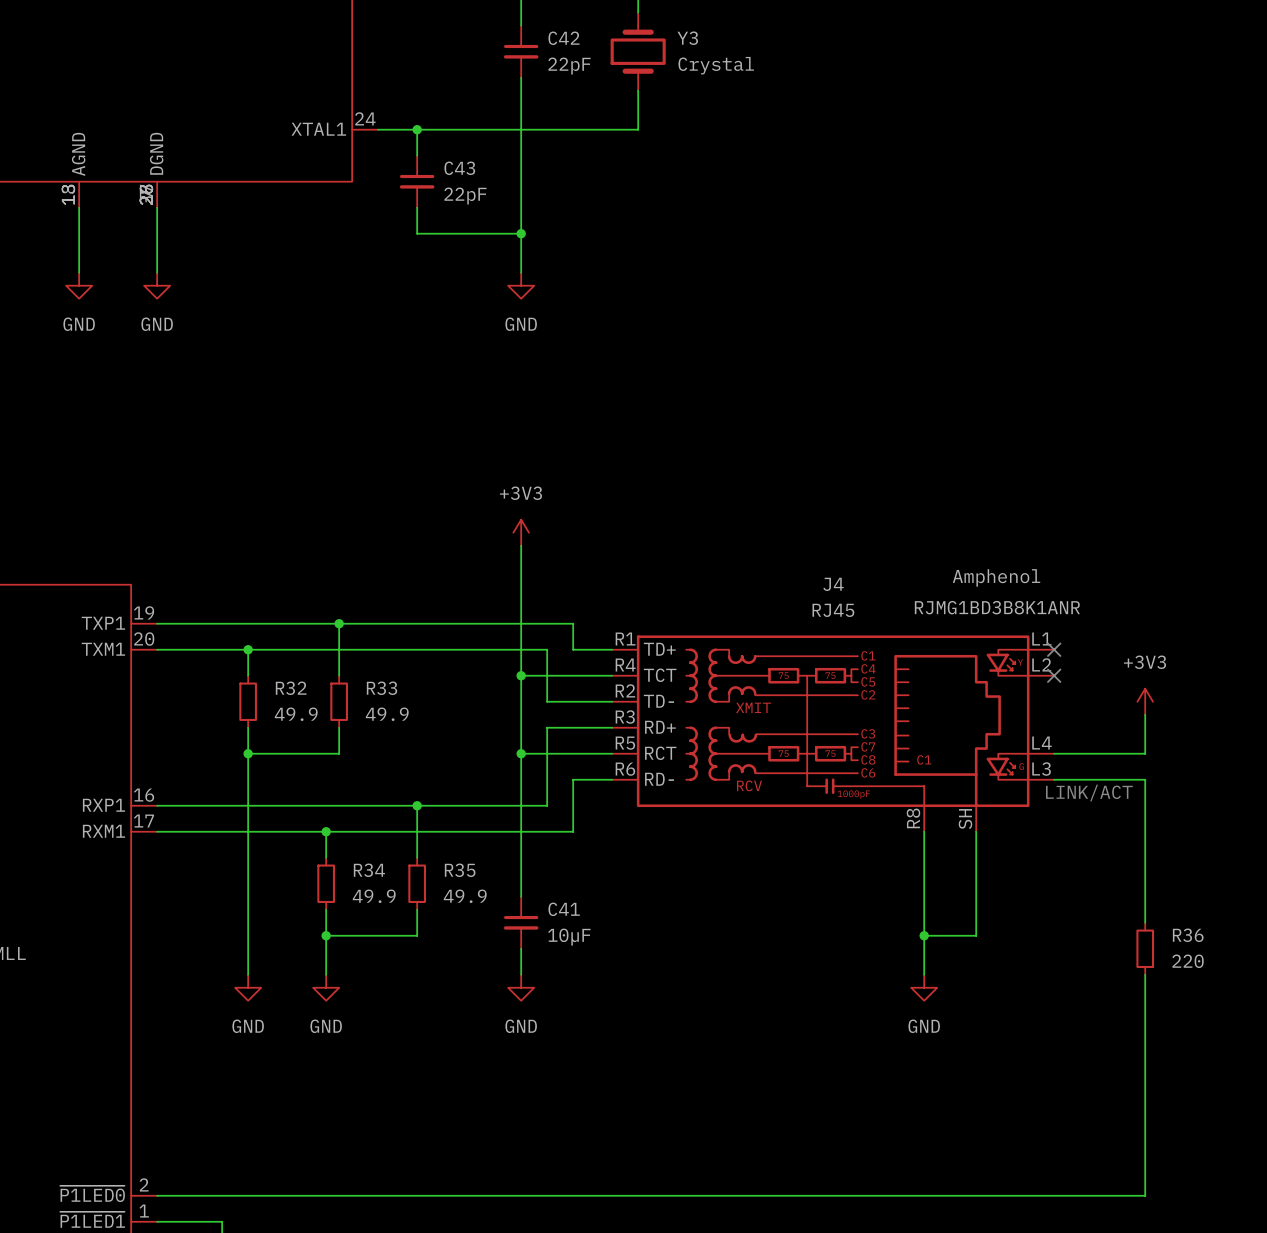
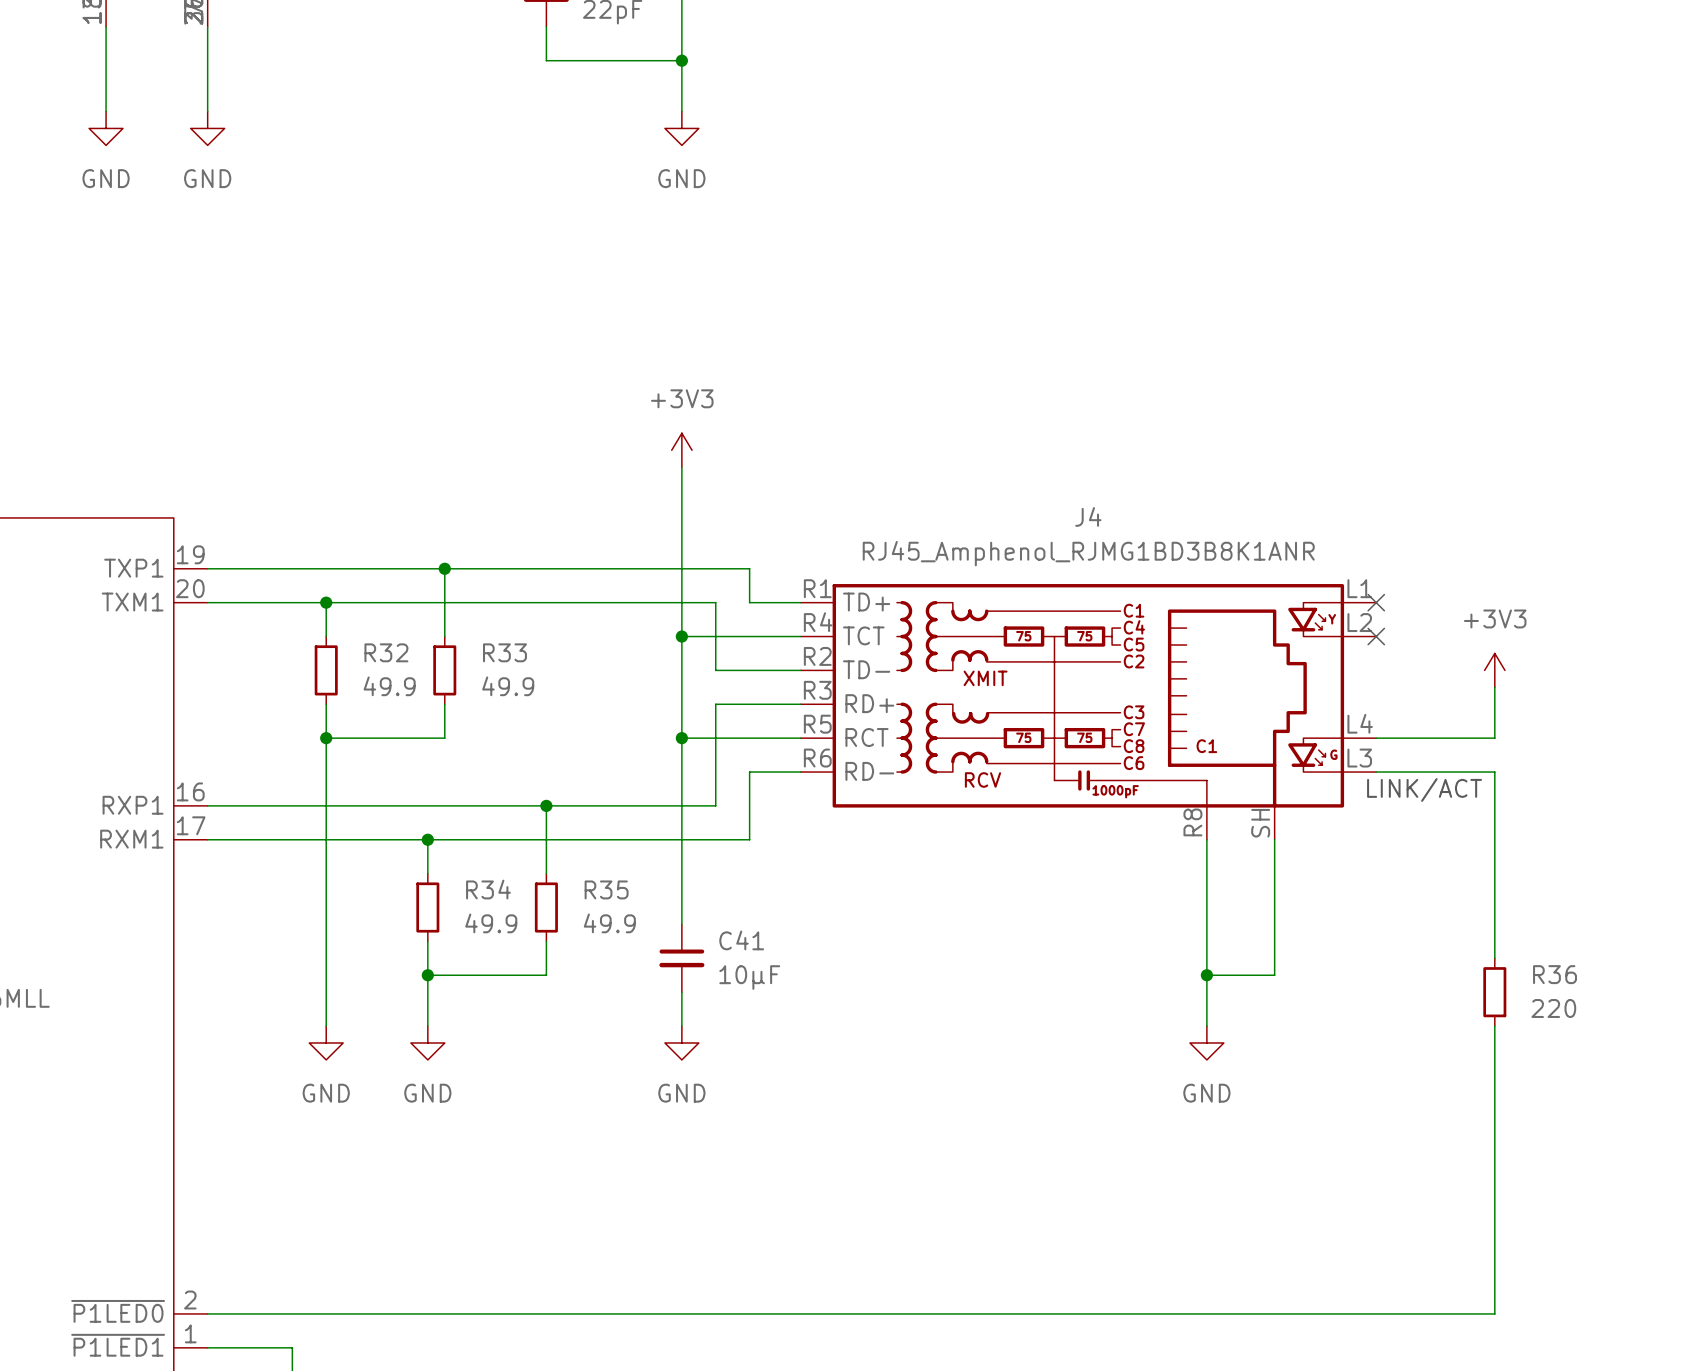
J4 text: Amphenol (996, 577) -> none
J4 text: RJMG1BD3B8K1ANR (997, 607) -> none
J4 value: RJ45 (833, 610) -> RJ45_Amphenol_RJMG1BD3B8K1ANR (1088, 553)

